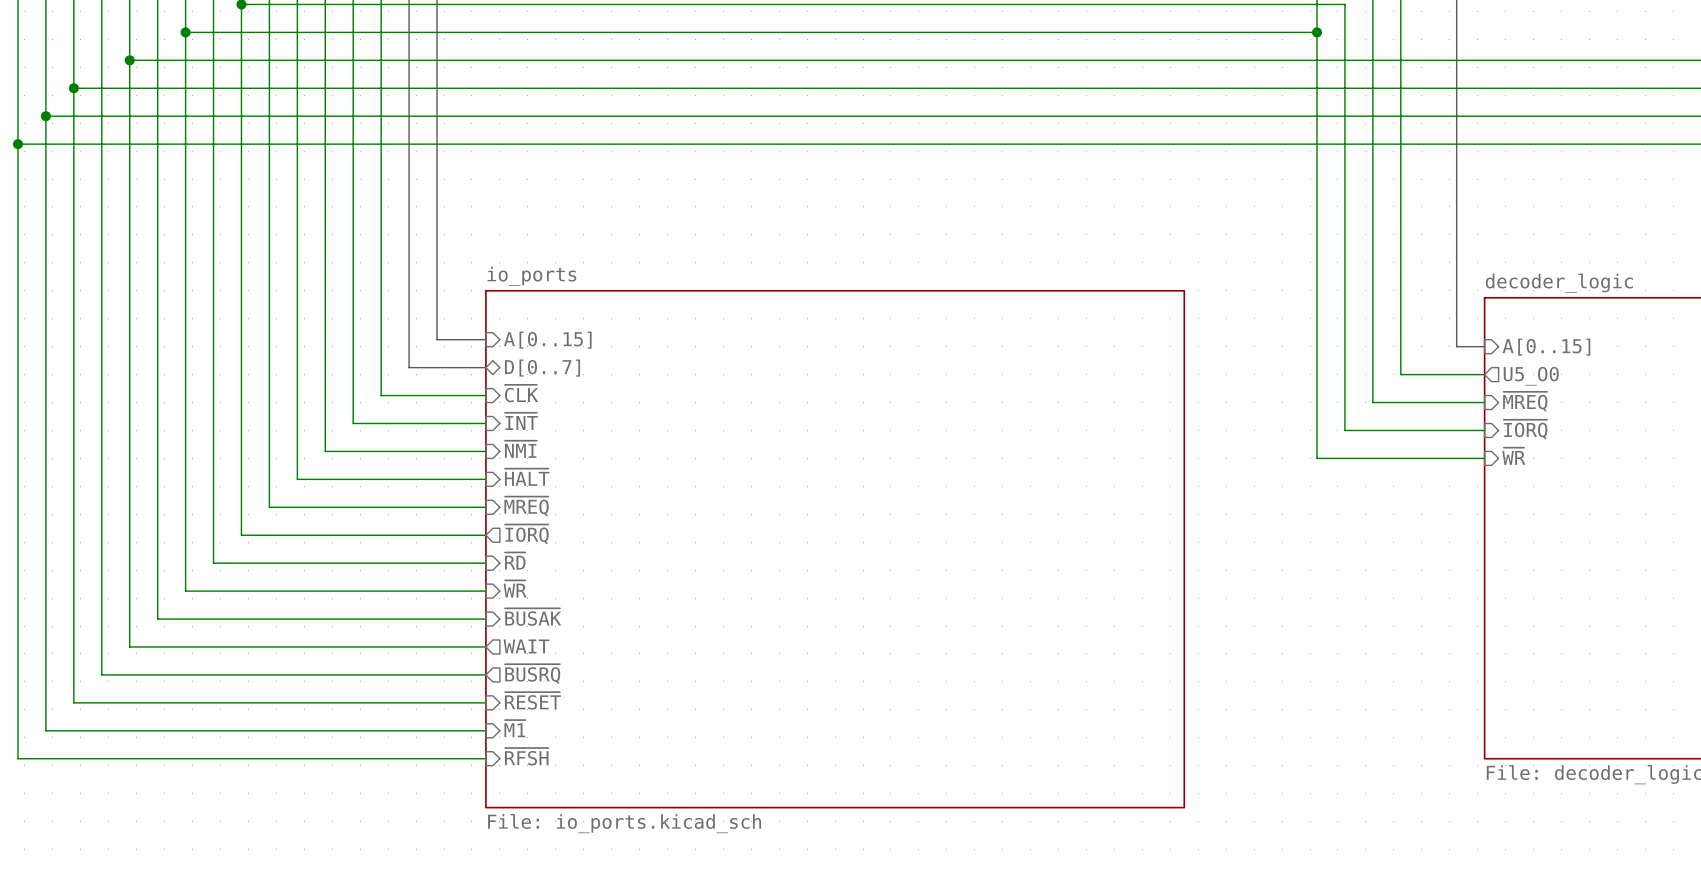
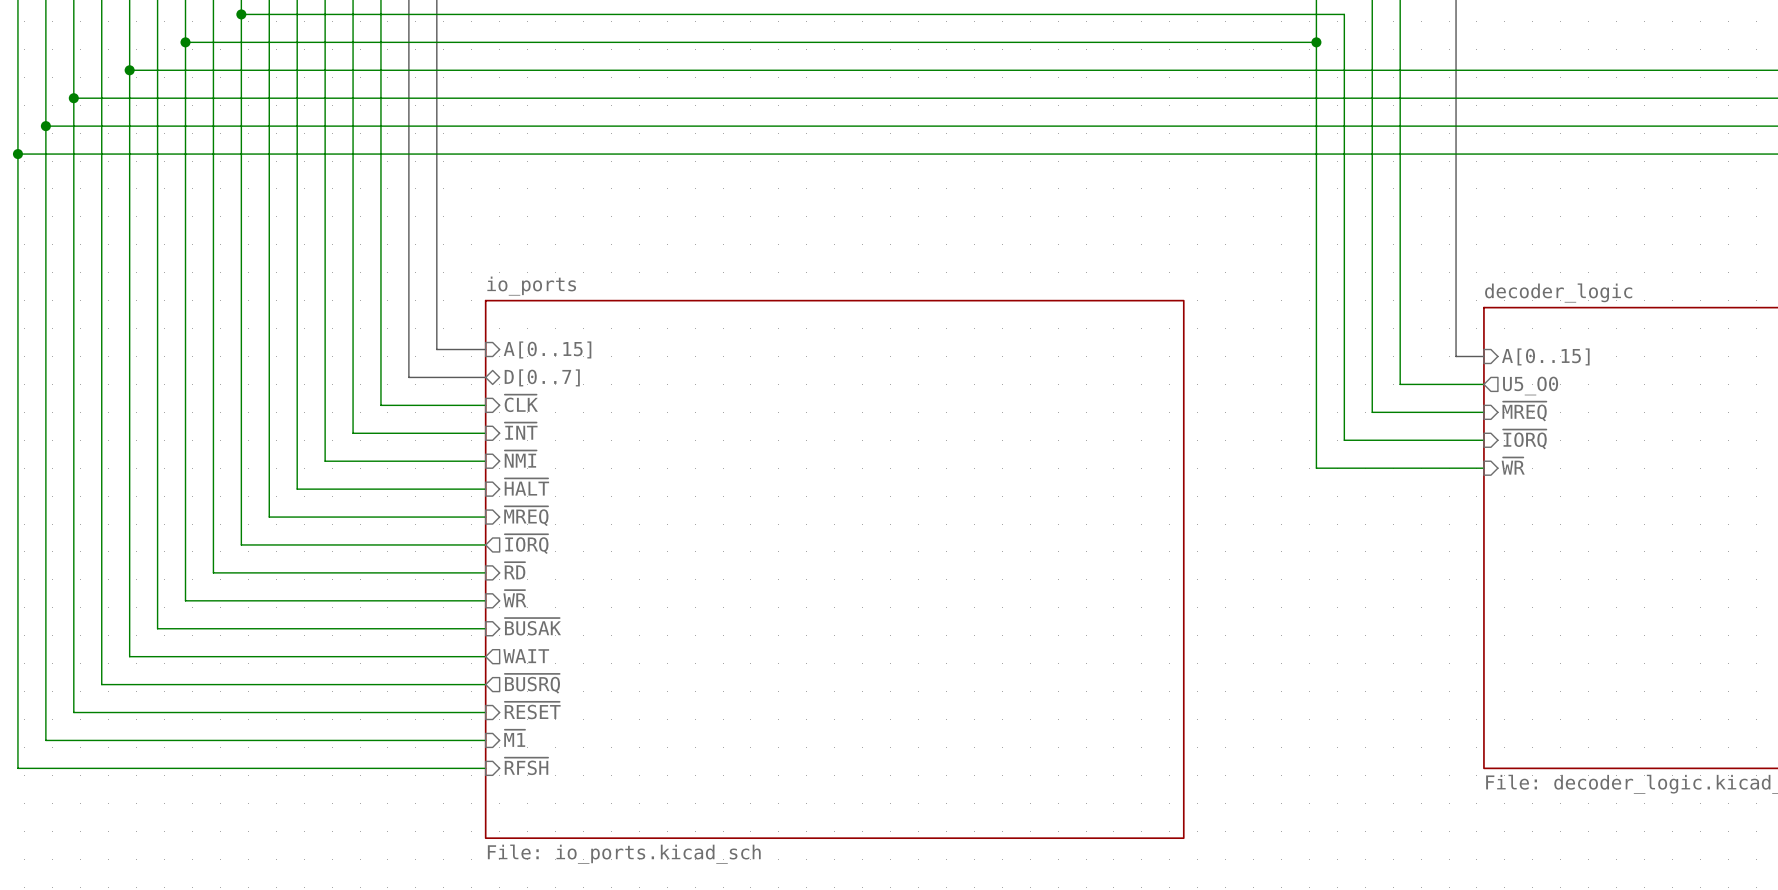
sheet io_ports shape: [485, 289, 1186, 809] -> [484, 299, 1185, 840]

